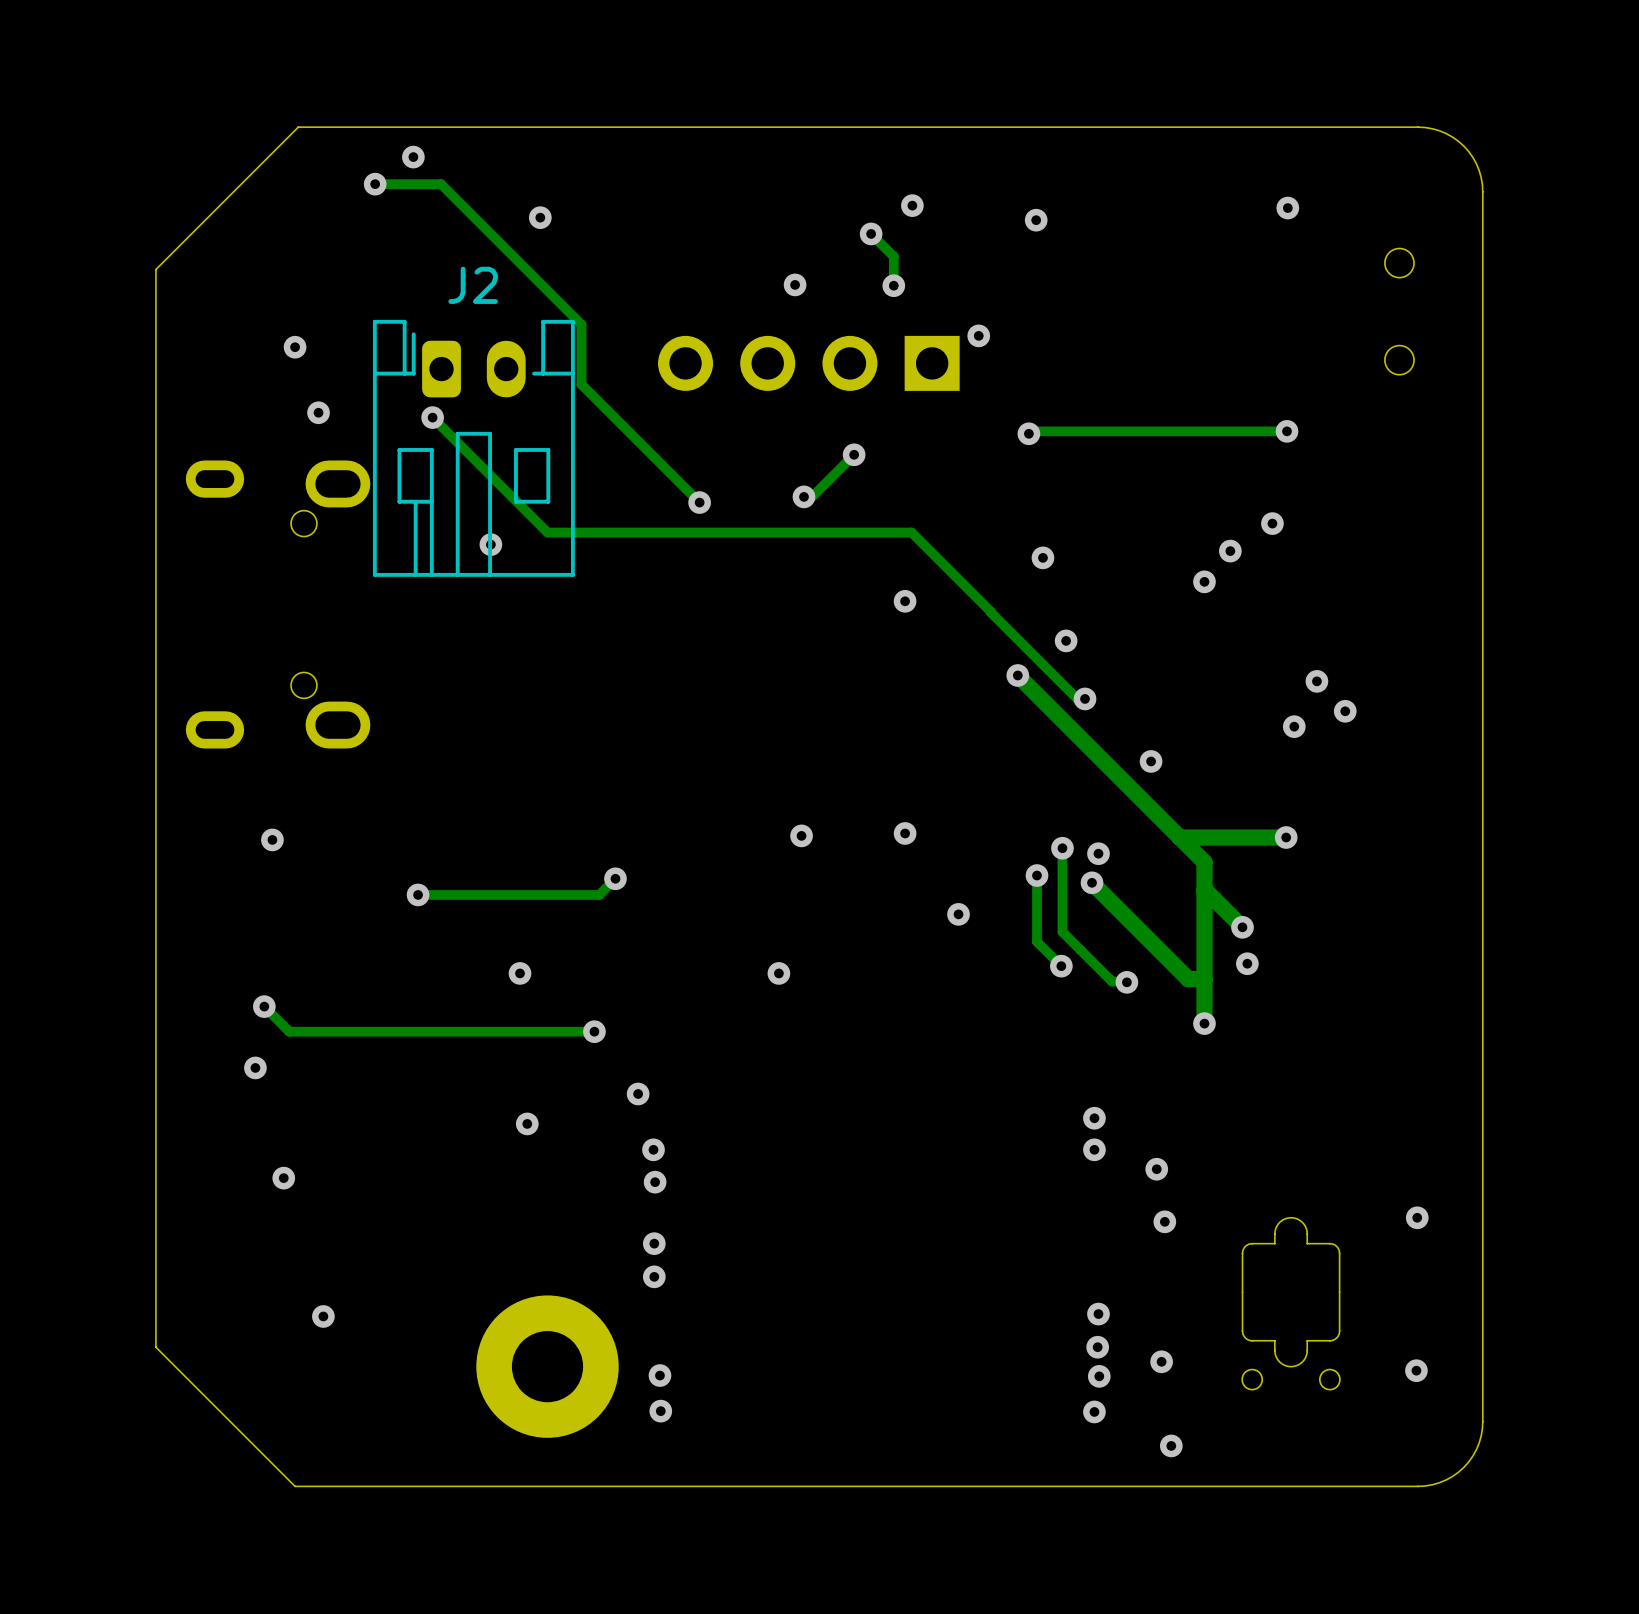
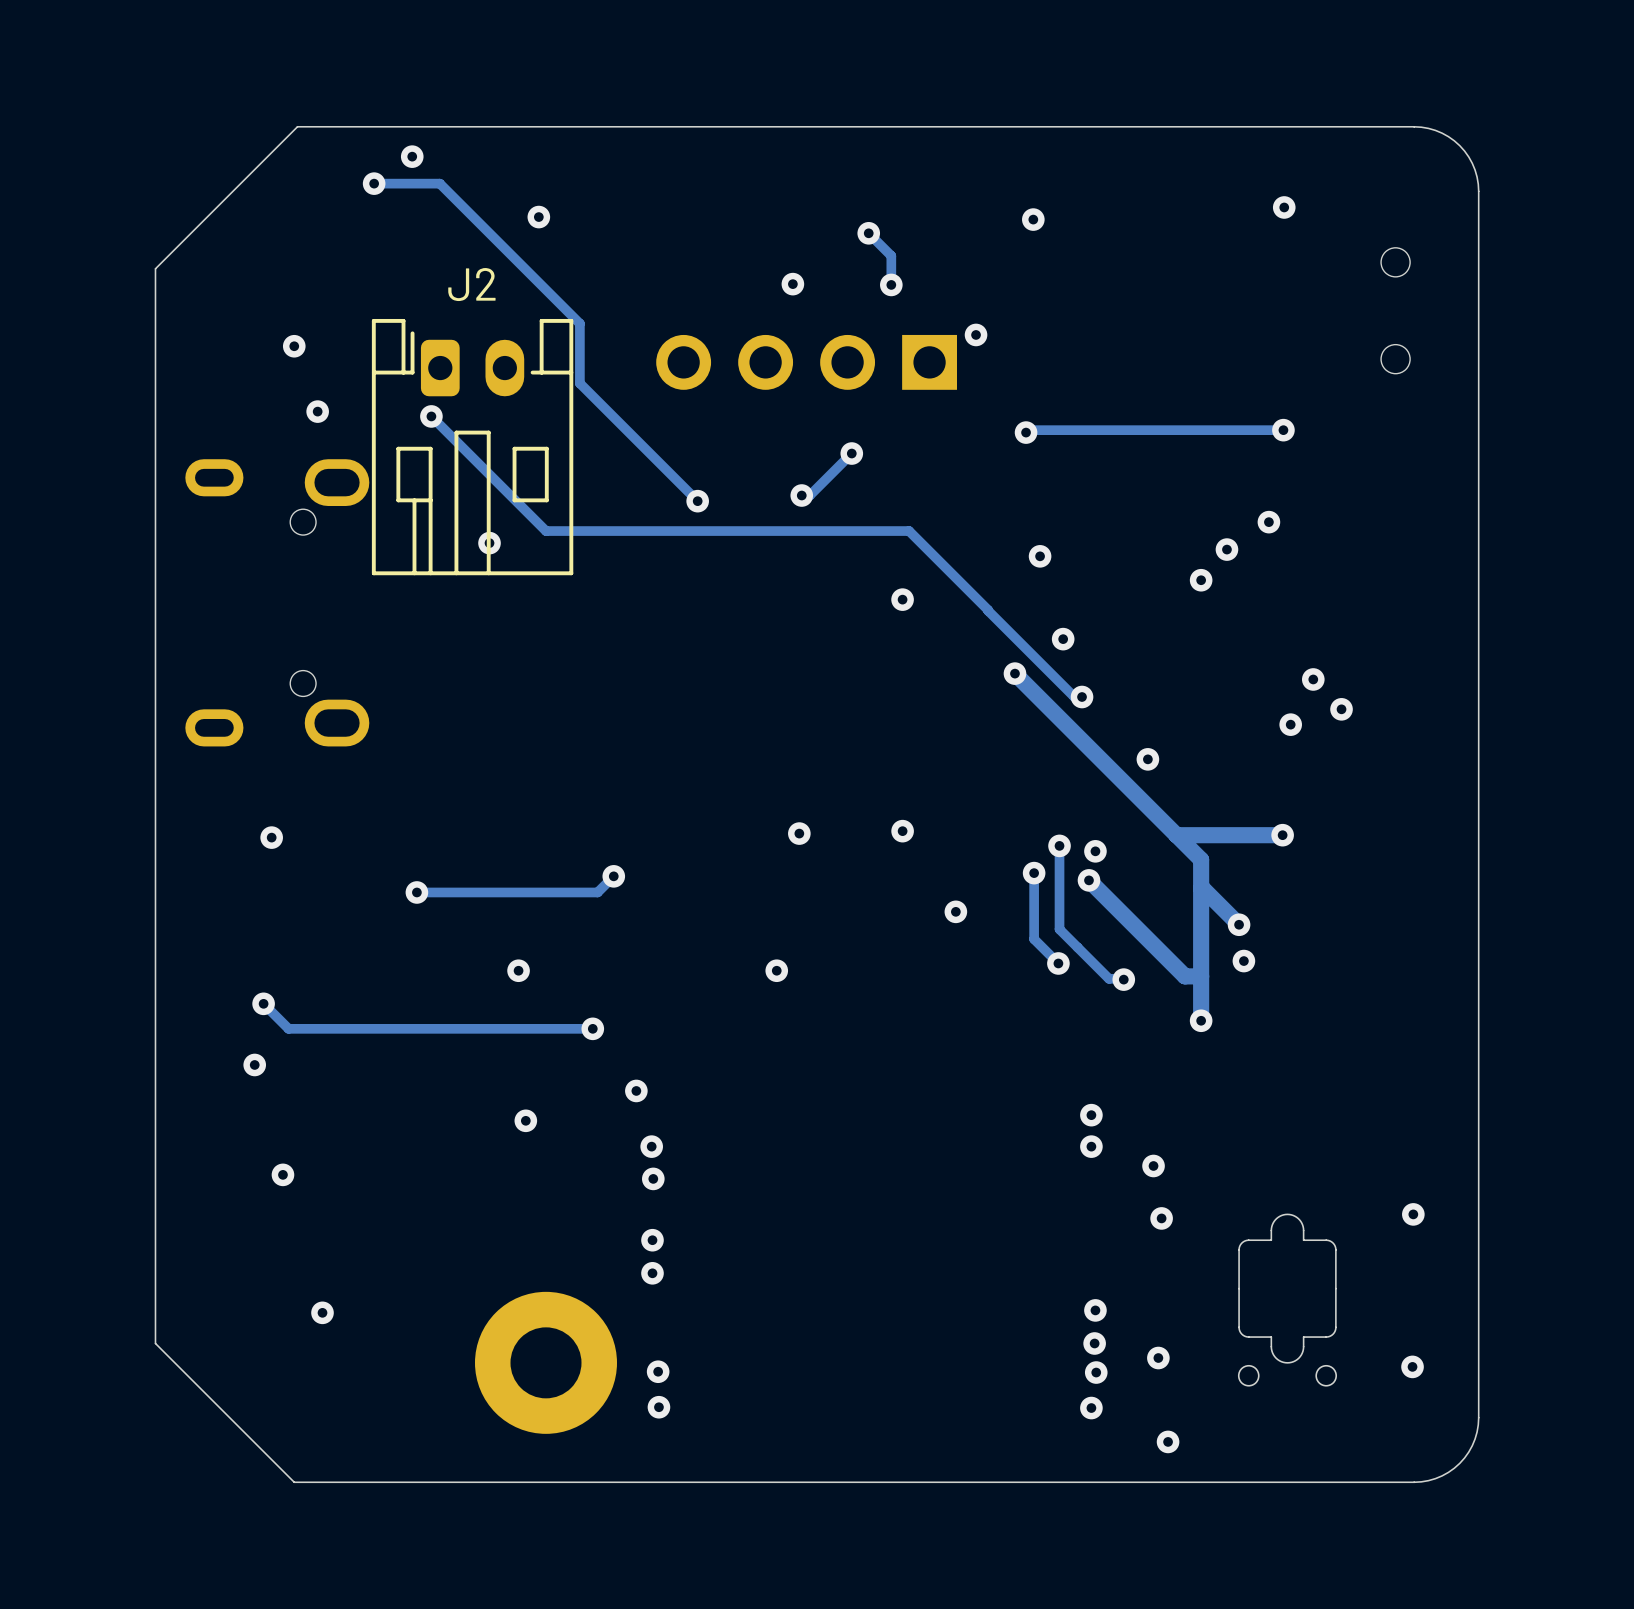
via: (912, 205) -> none

